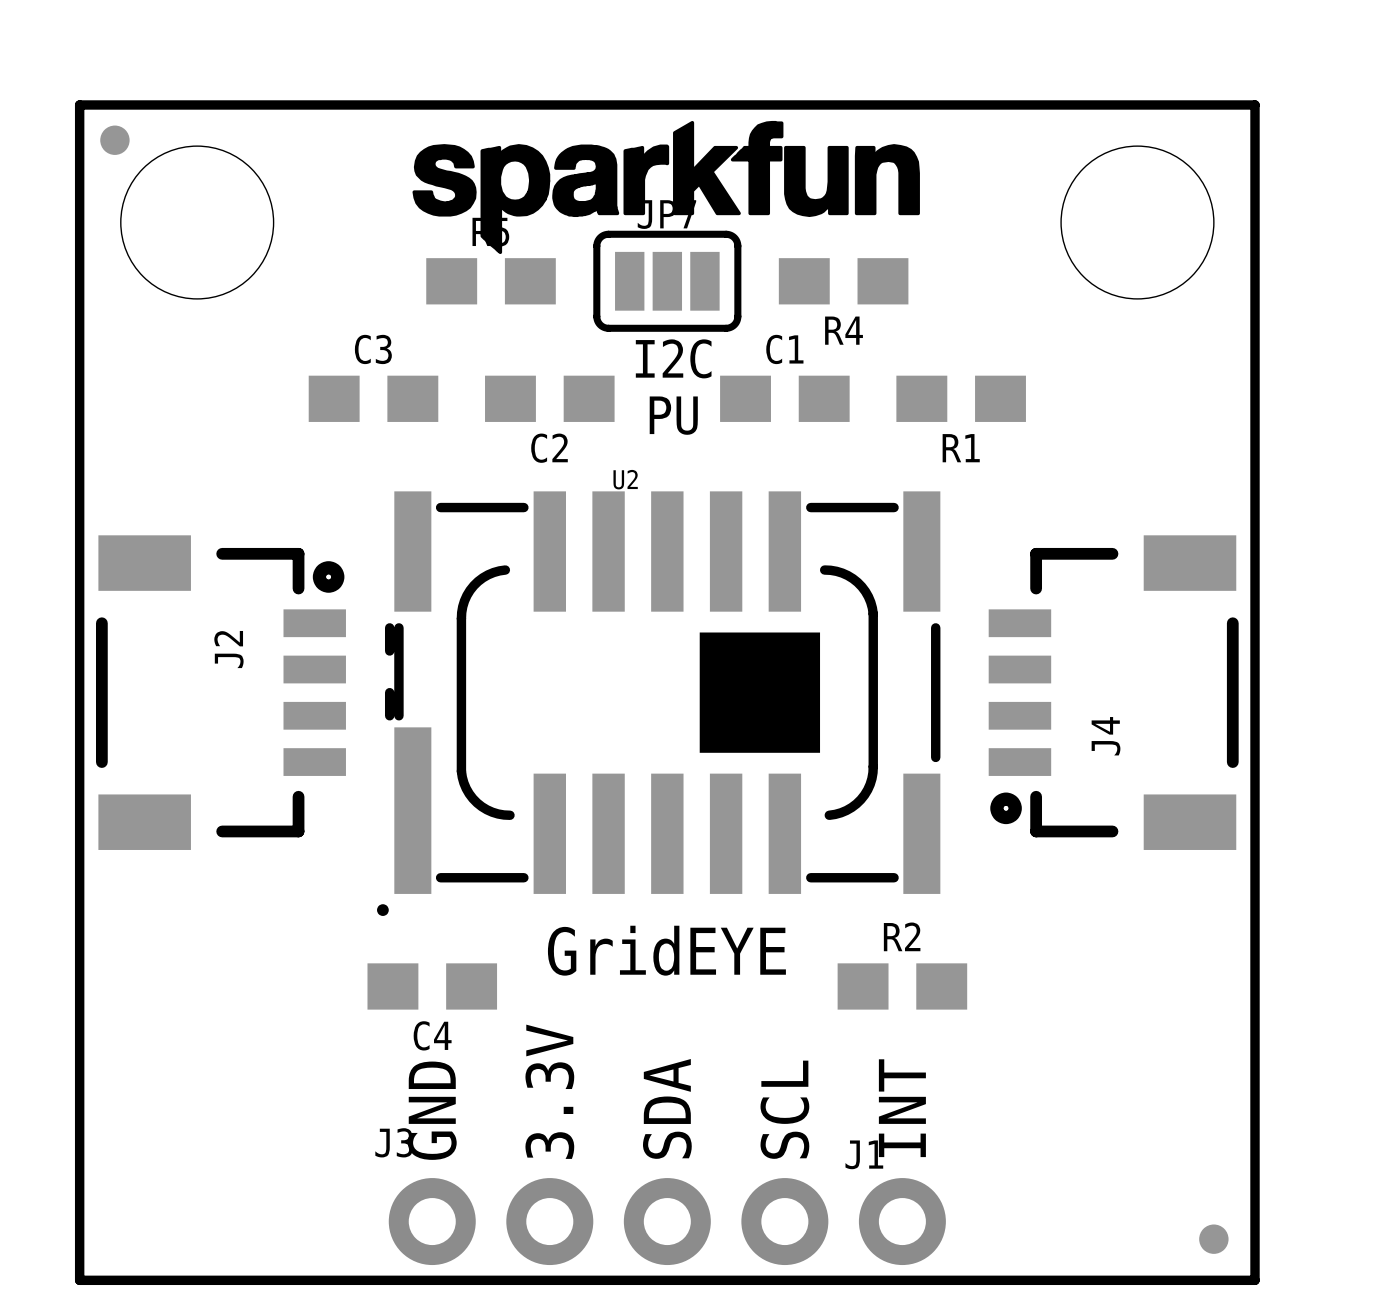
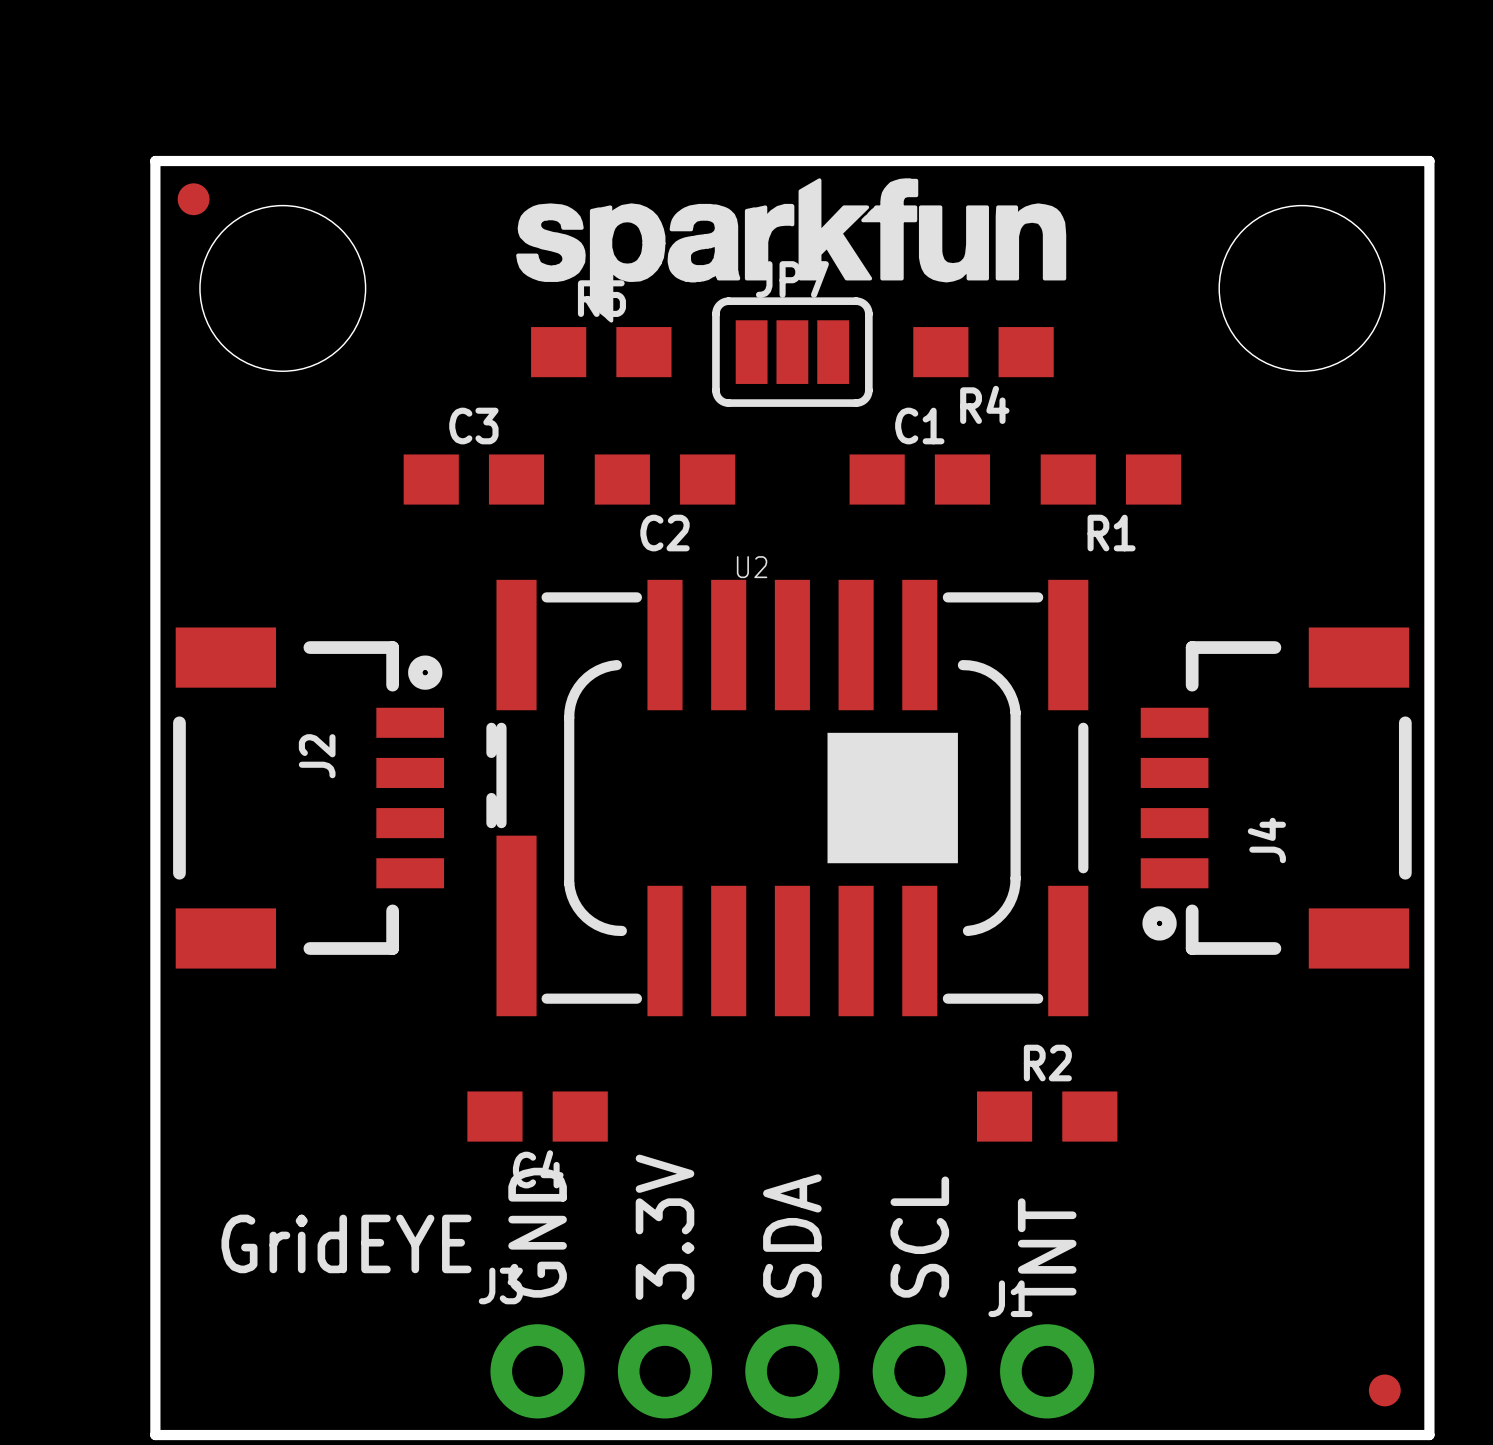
text: I2C (673, 358) -> none
text: PU (673, 415) -> none
U2 footprint: [377, 491, 941, 916] -> [486, 579, 1089, 1017]
text position: GridEYE (666, 950) -> GridEYE (346, 1243)

